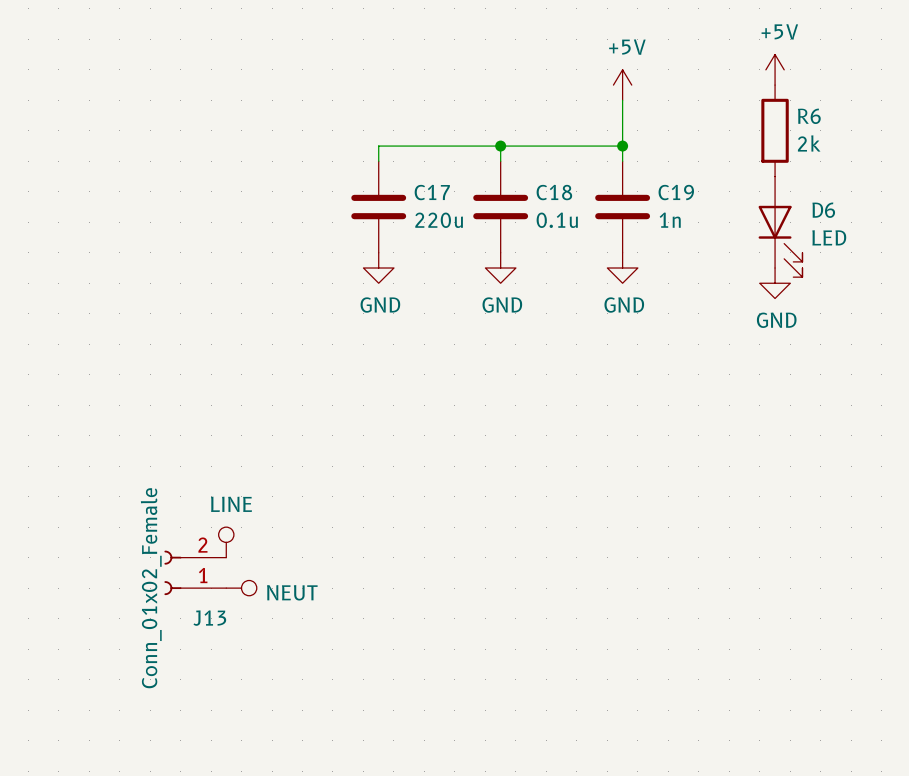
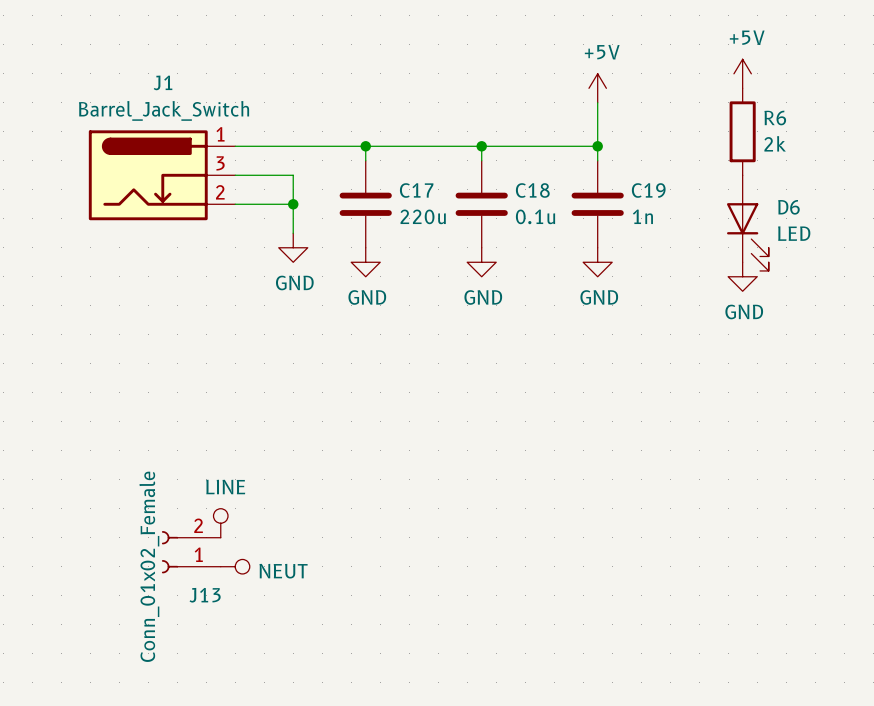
wire: none -> (235, 146) (365, 146)
junction: none -> (365, 146)
J1: none -> Barrel_Jack_Switch (162, 175)
wire: none -> (235, 175) (293, 175) (293, 233)
wire: none -> (235, 204) (293, 204)
junction: none -> (293, 204)
power symbol: none -> GND (293, 247)

